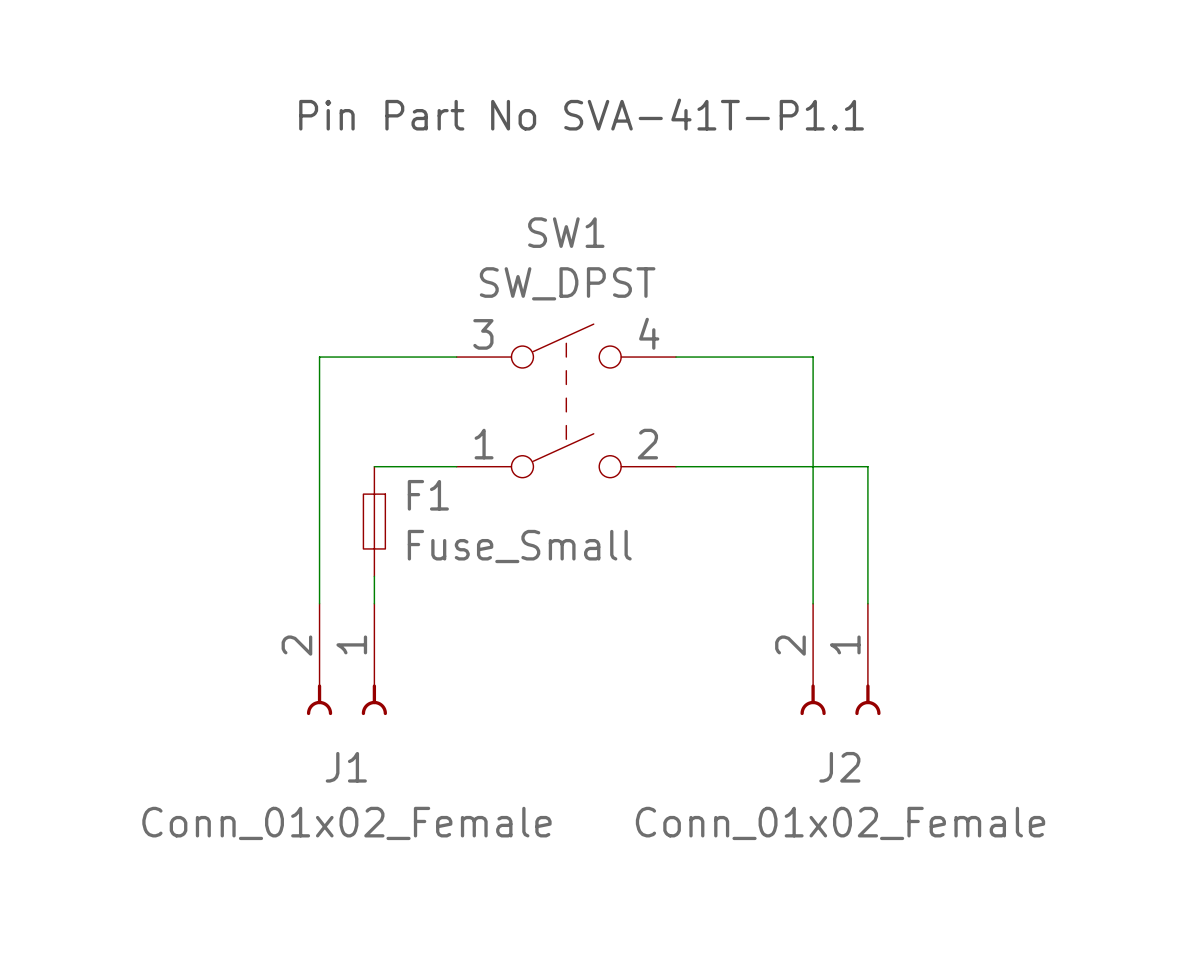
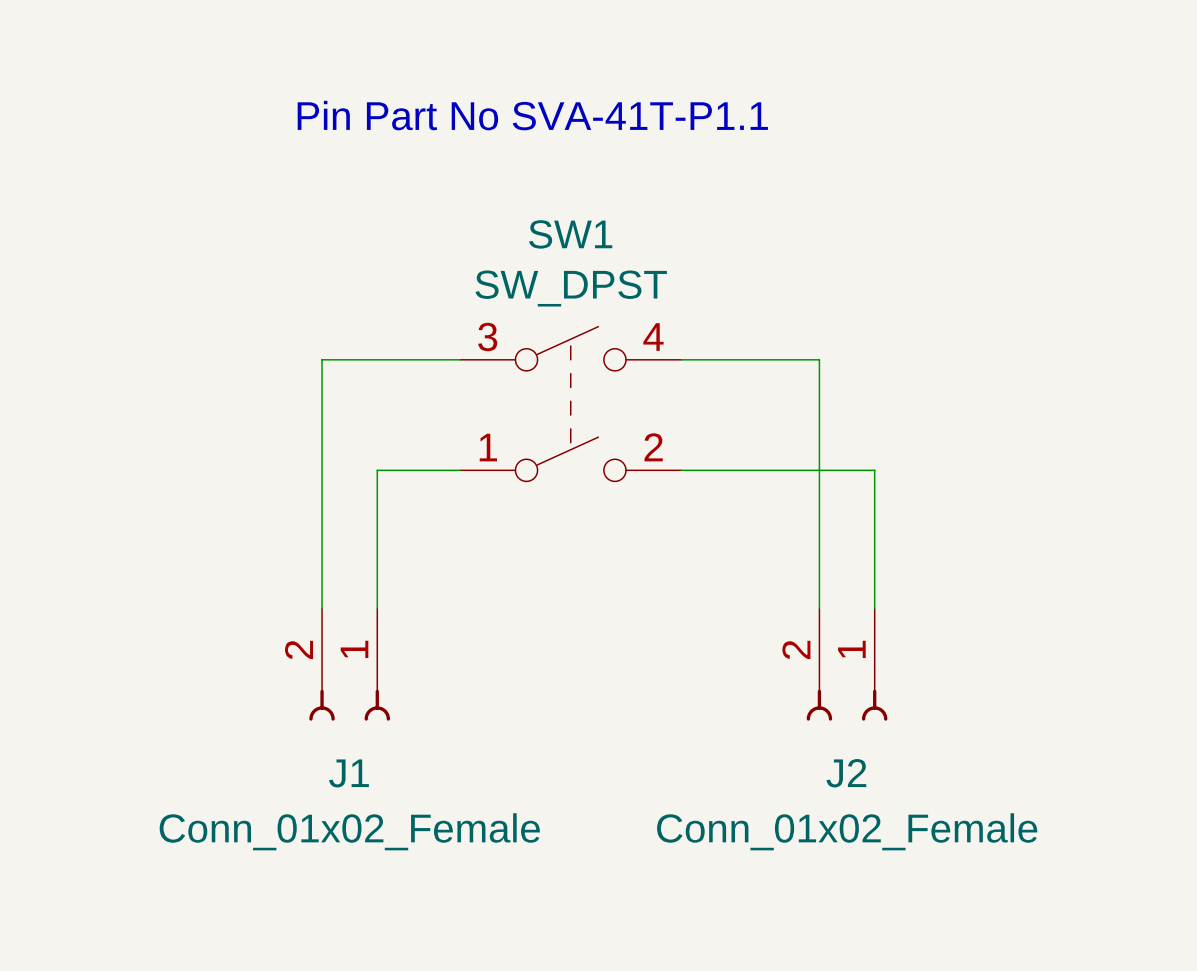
F1: Fuse_Small (374, 521) -> none

